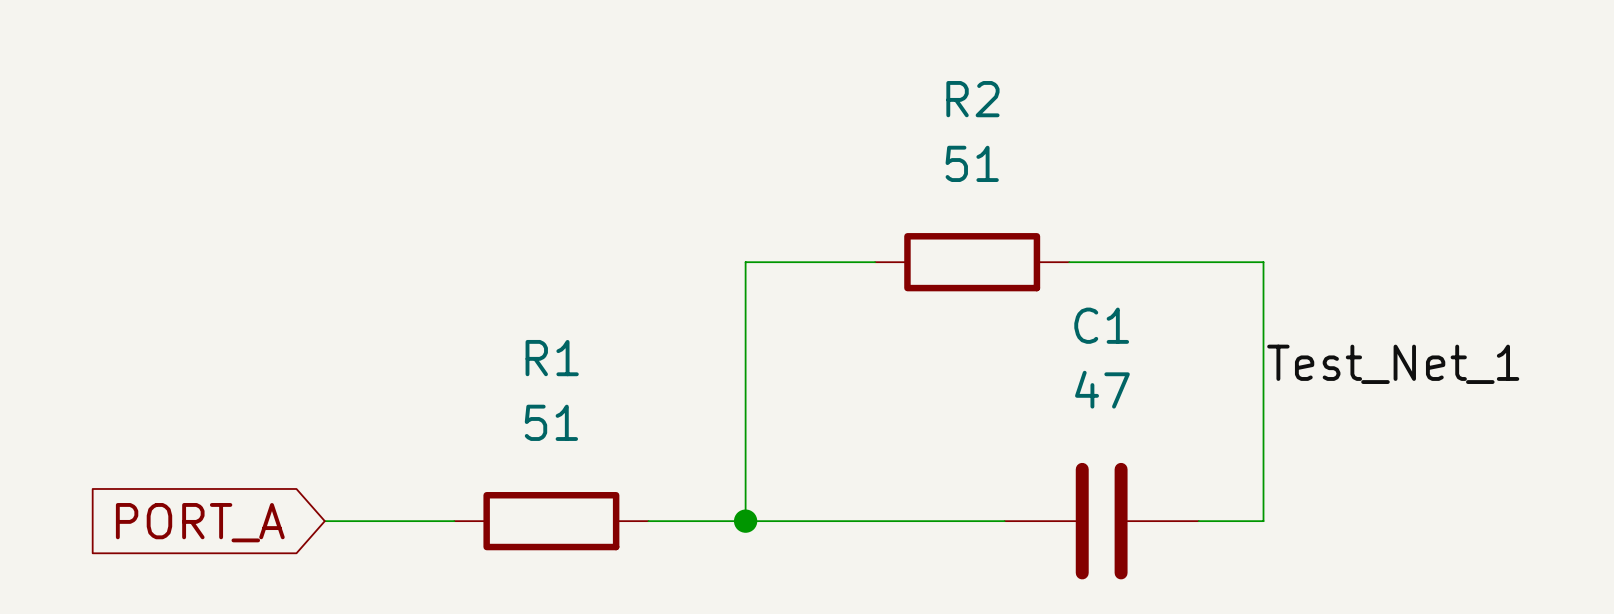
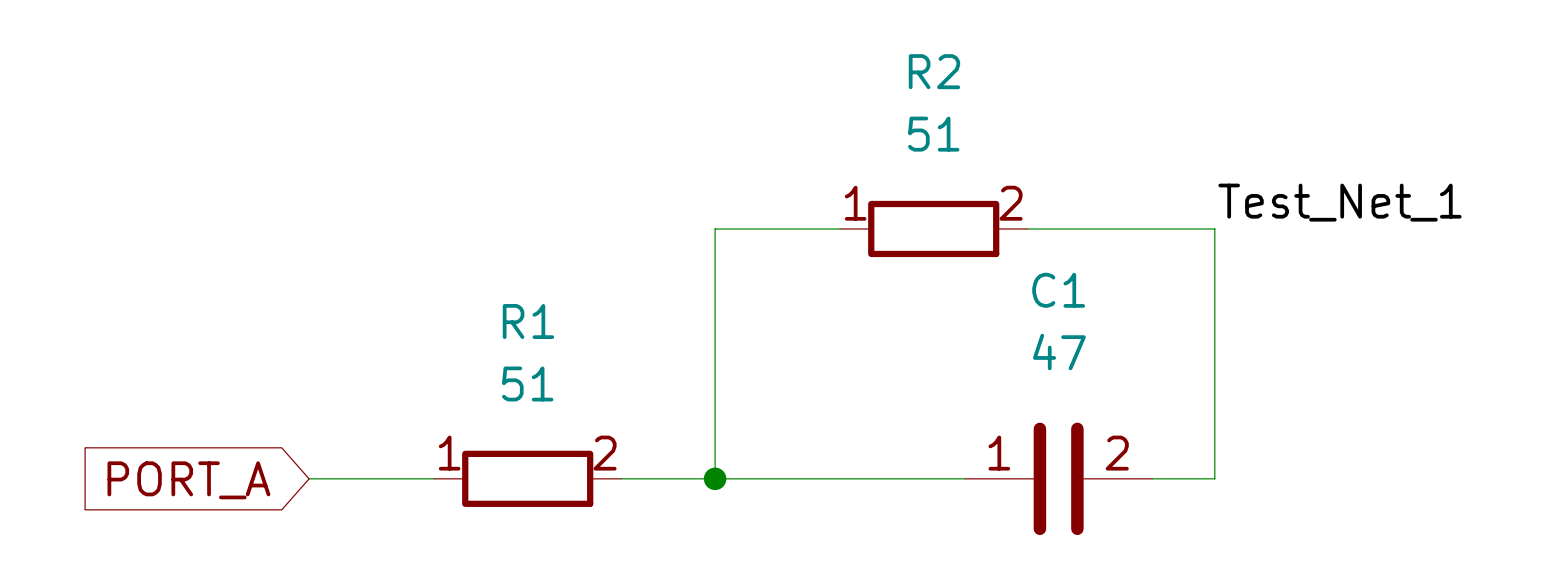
R2 pin number: none -> 1 (855, 203)
R2 pin number: none -> 2 (1011, 203)
label position: Test_Net_1 (1393, 364) -> Test_Net_1 (1339, 202)
R1 pin number: none -> 1 (449, 453)
R1 pin number: none -> 2 (605, 453)
C1 pin number: none -> 1 (999, 453)
C1 pin number: none -> 2 (1117, 453)

